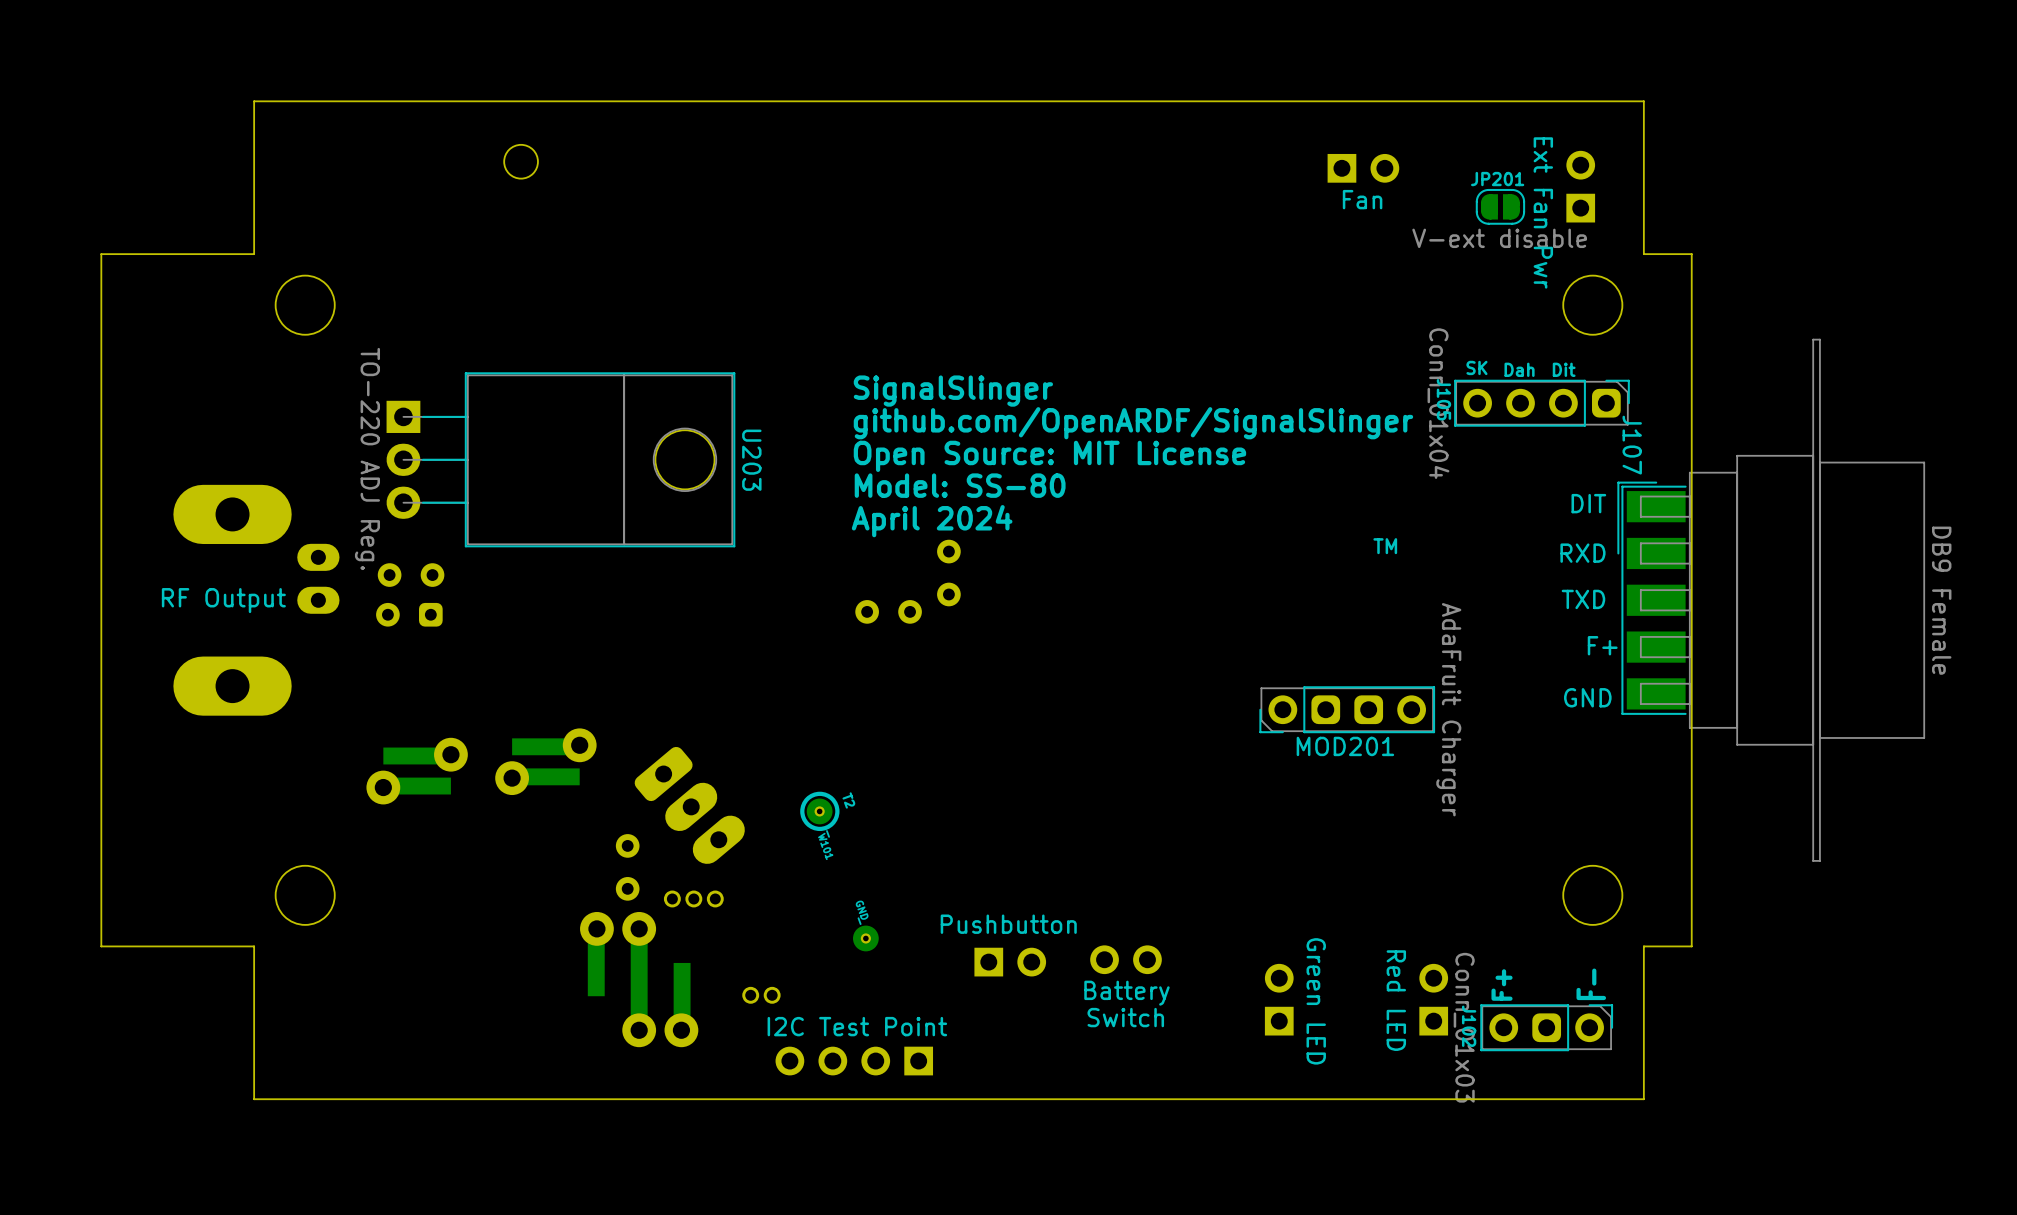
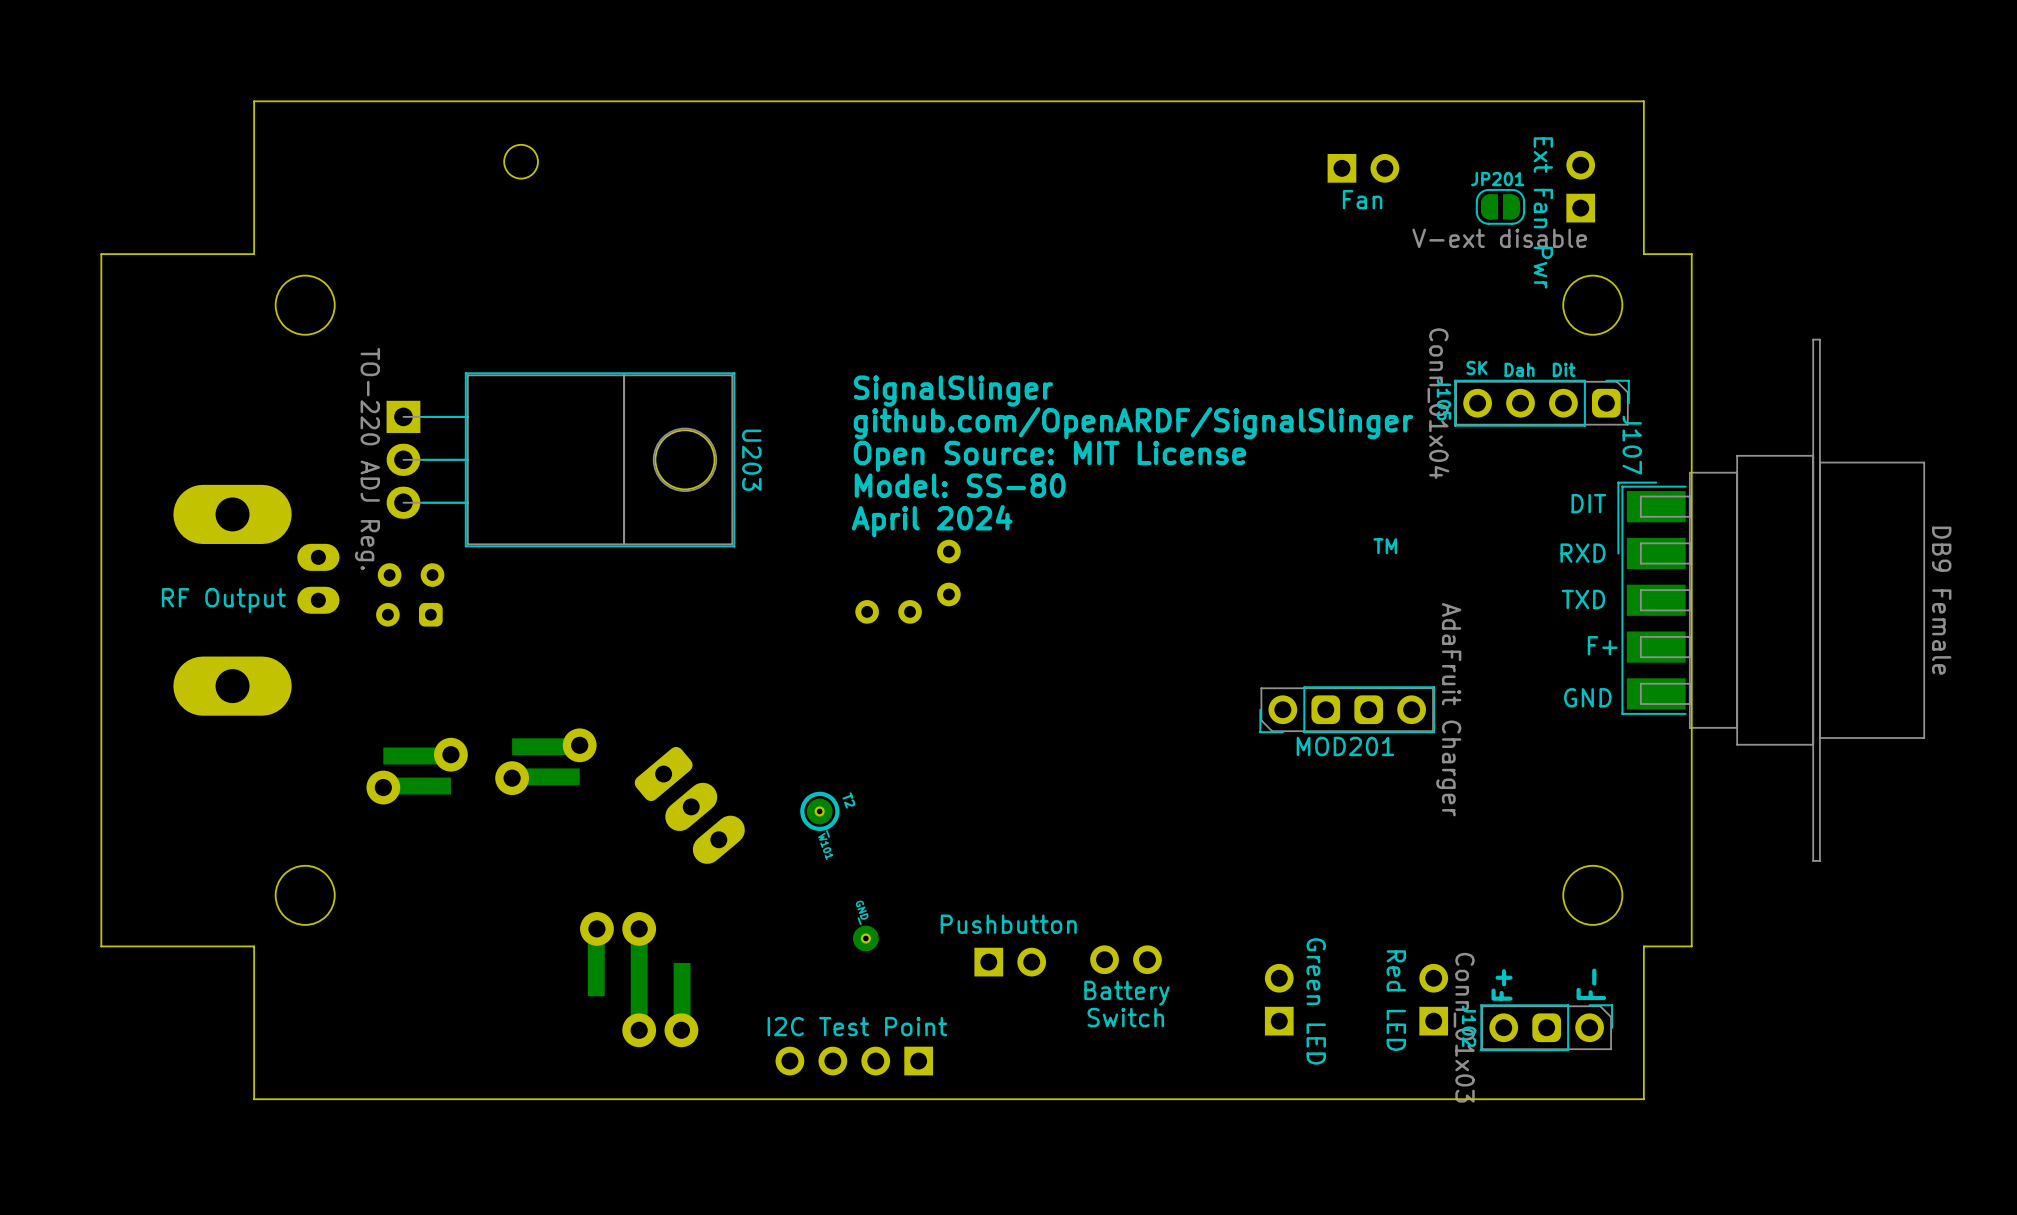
part: (627, 867) -> none
part: (693, 898) -> none
part: (761, 995) -> none

